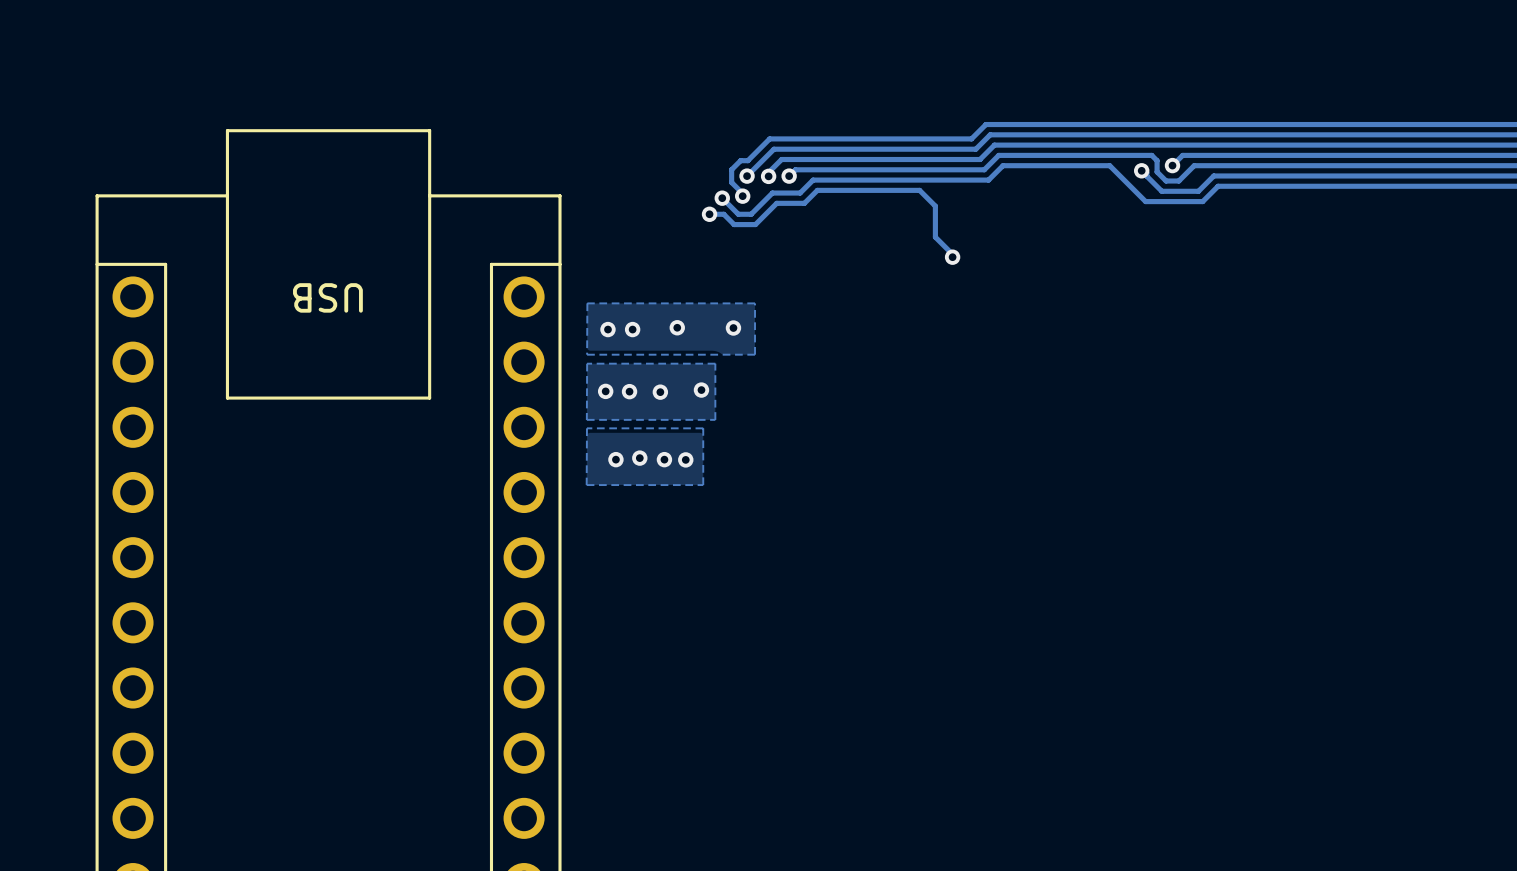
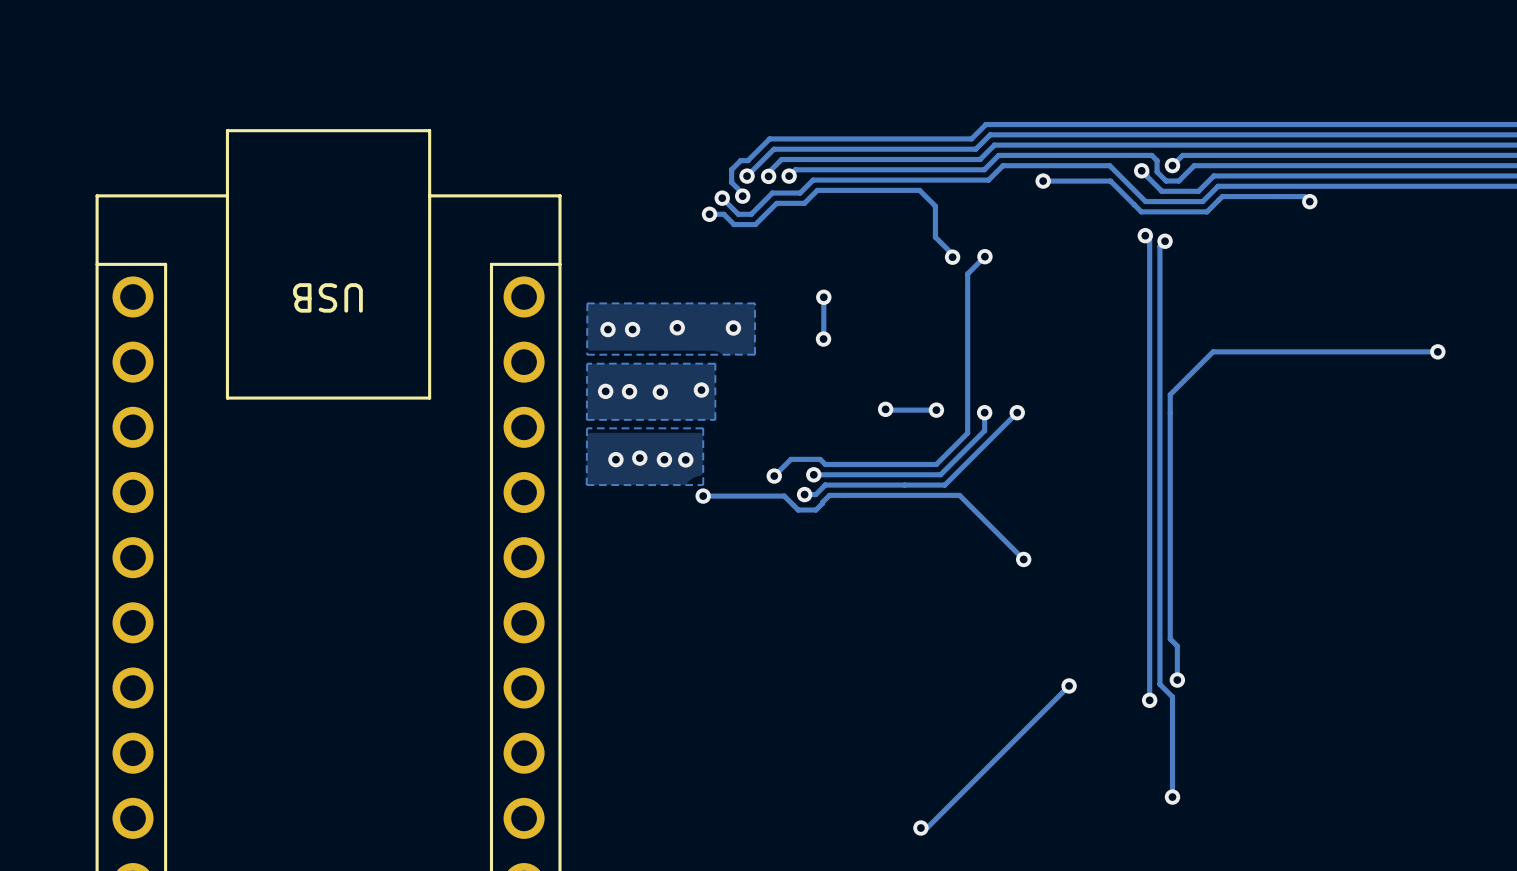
track: none -> (1043, 181) (1110, 181) (1141, 211) (1207, 211) (1222, 196) (1304, 196) (1309, 201)
via: none -> (1043, 181)
via: none -> (1309, 201)
track: none -> (1145, 235) (1149, 240) (1149, 700)
via: none -> (1145, 235)
track: none -> (1165, 241) (1159, 246) (1159, 684) (1172, 696) (1172, 797)
via: none -> (1165, 241)
track: none -> (984, 256) (967, 273) (967, 433) (936, 464) (825, 464) (820, 459) (790, 459) (774, 476)
via: none -> (984, 256)
track: none -> (823, 297) (823, 338)
via: none -> (823, 297)
via: none -> (823, 339)
track: none -> (1437, 351) (1213, 351) (1170, 394) (1170, 639) (1177, 646) (1177, 680)
via: none -> (1437, 351)
track: none -> (885, 409) (936, 410)
via: none -> (885, 409)
via: none -> (936, 410)
track: none -> (984, 412) (984, 430) (940, 474) (813, 474)
via: none -> (984, 412)
track: none -> (1017, 412) (944, 485) (825, 485) (815, 494) (804, 494)
via: none -> (1017, 412)
via: none -> (813, 474)
via: none -> (774, 476)
via: none -> (804, 494)
track: none -> (703, 496) (784, 496) (798, 509) (816, 509) (829, 495) (959, 495) (1023, 559)
via: none -> (703, 496)
via: none -> (1023, 559)
via: none -> (1177, 680)
track: none -> (1069, 685) (927, 828) (920, 828)
via: none -> (1069, 685)
via: none -> (1149, 700)
via: none -> (1172, 797)
via: none -> (920, 828)

